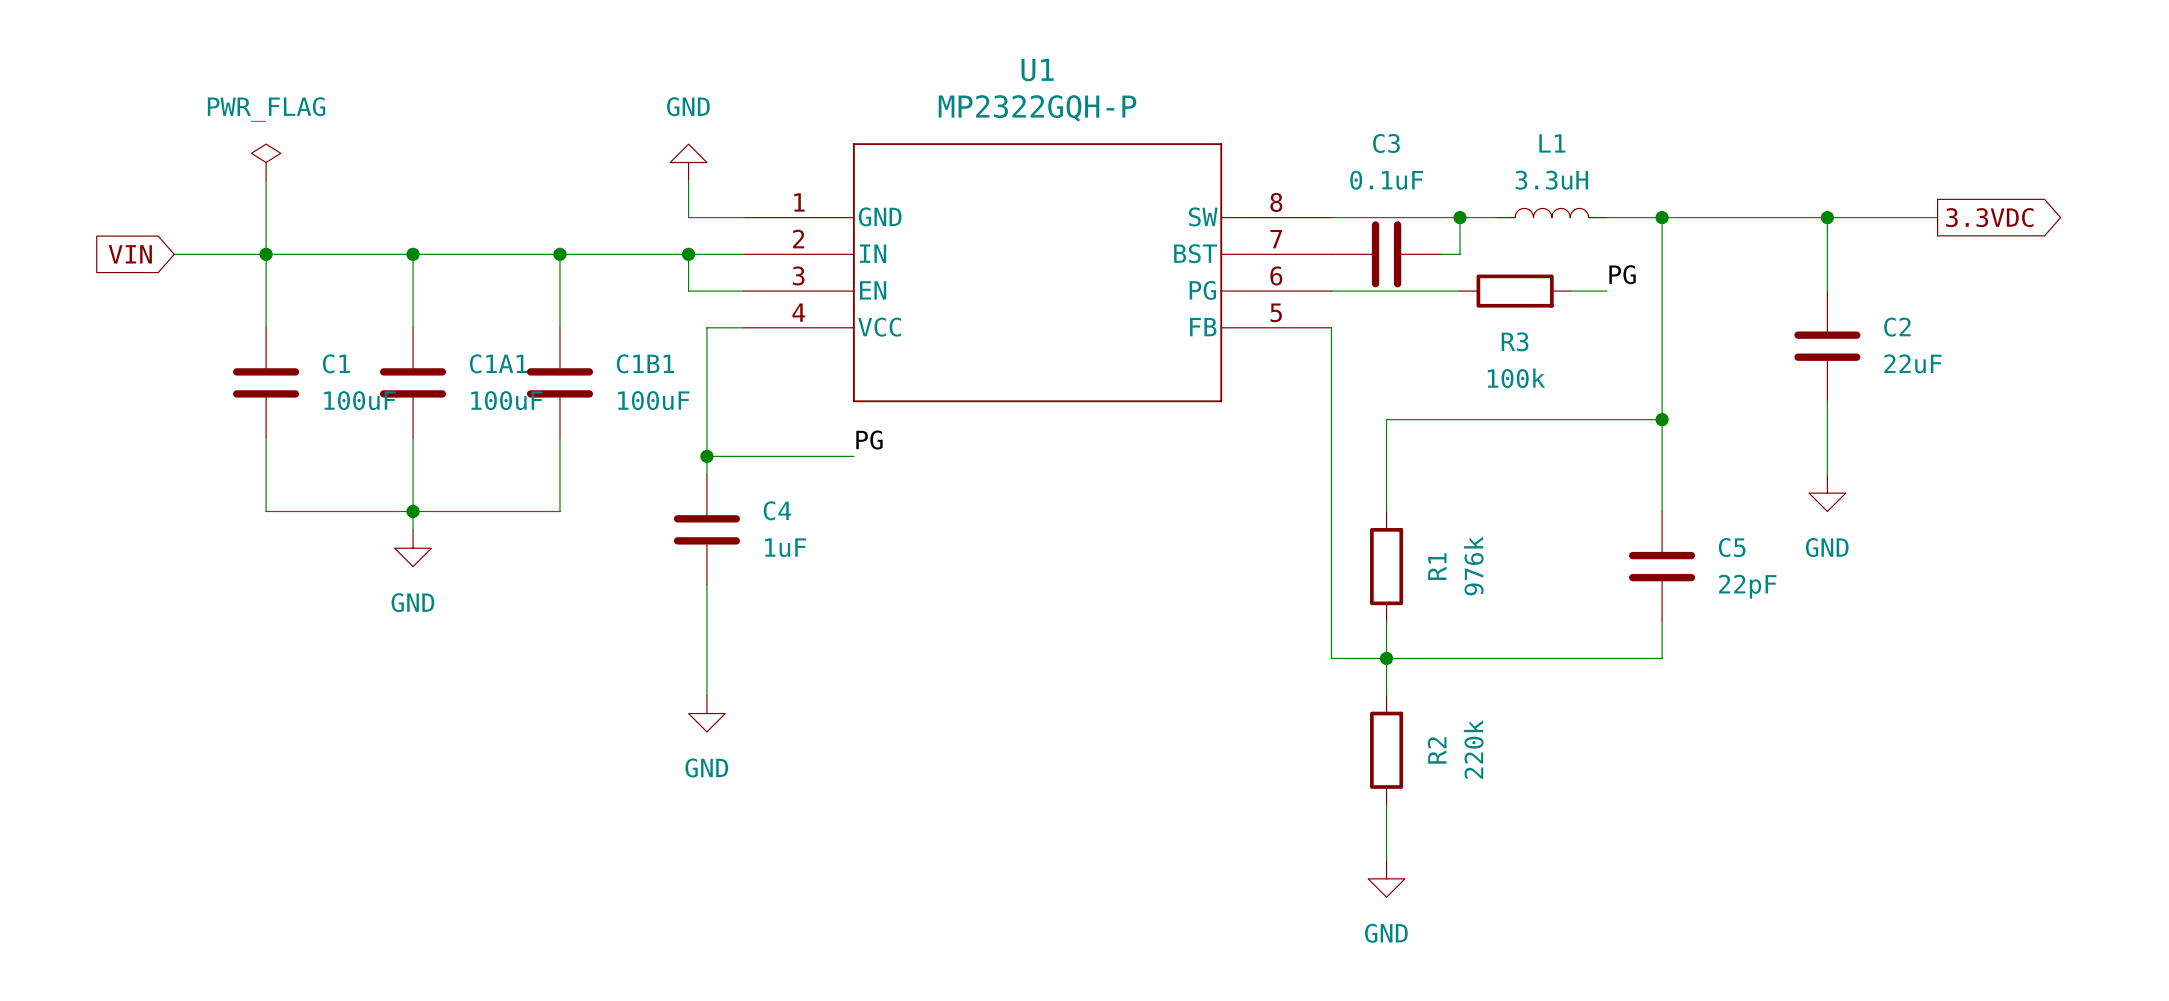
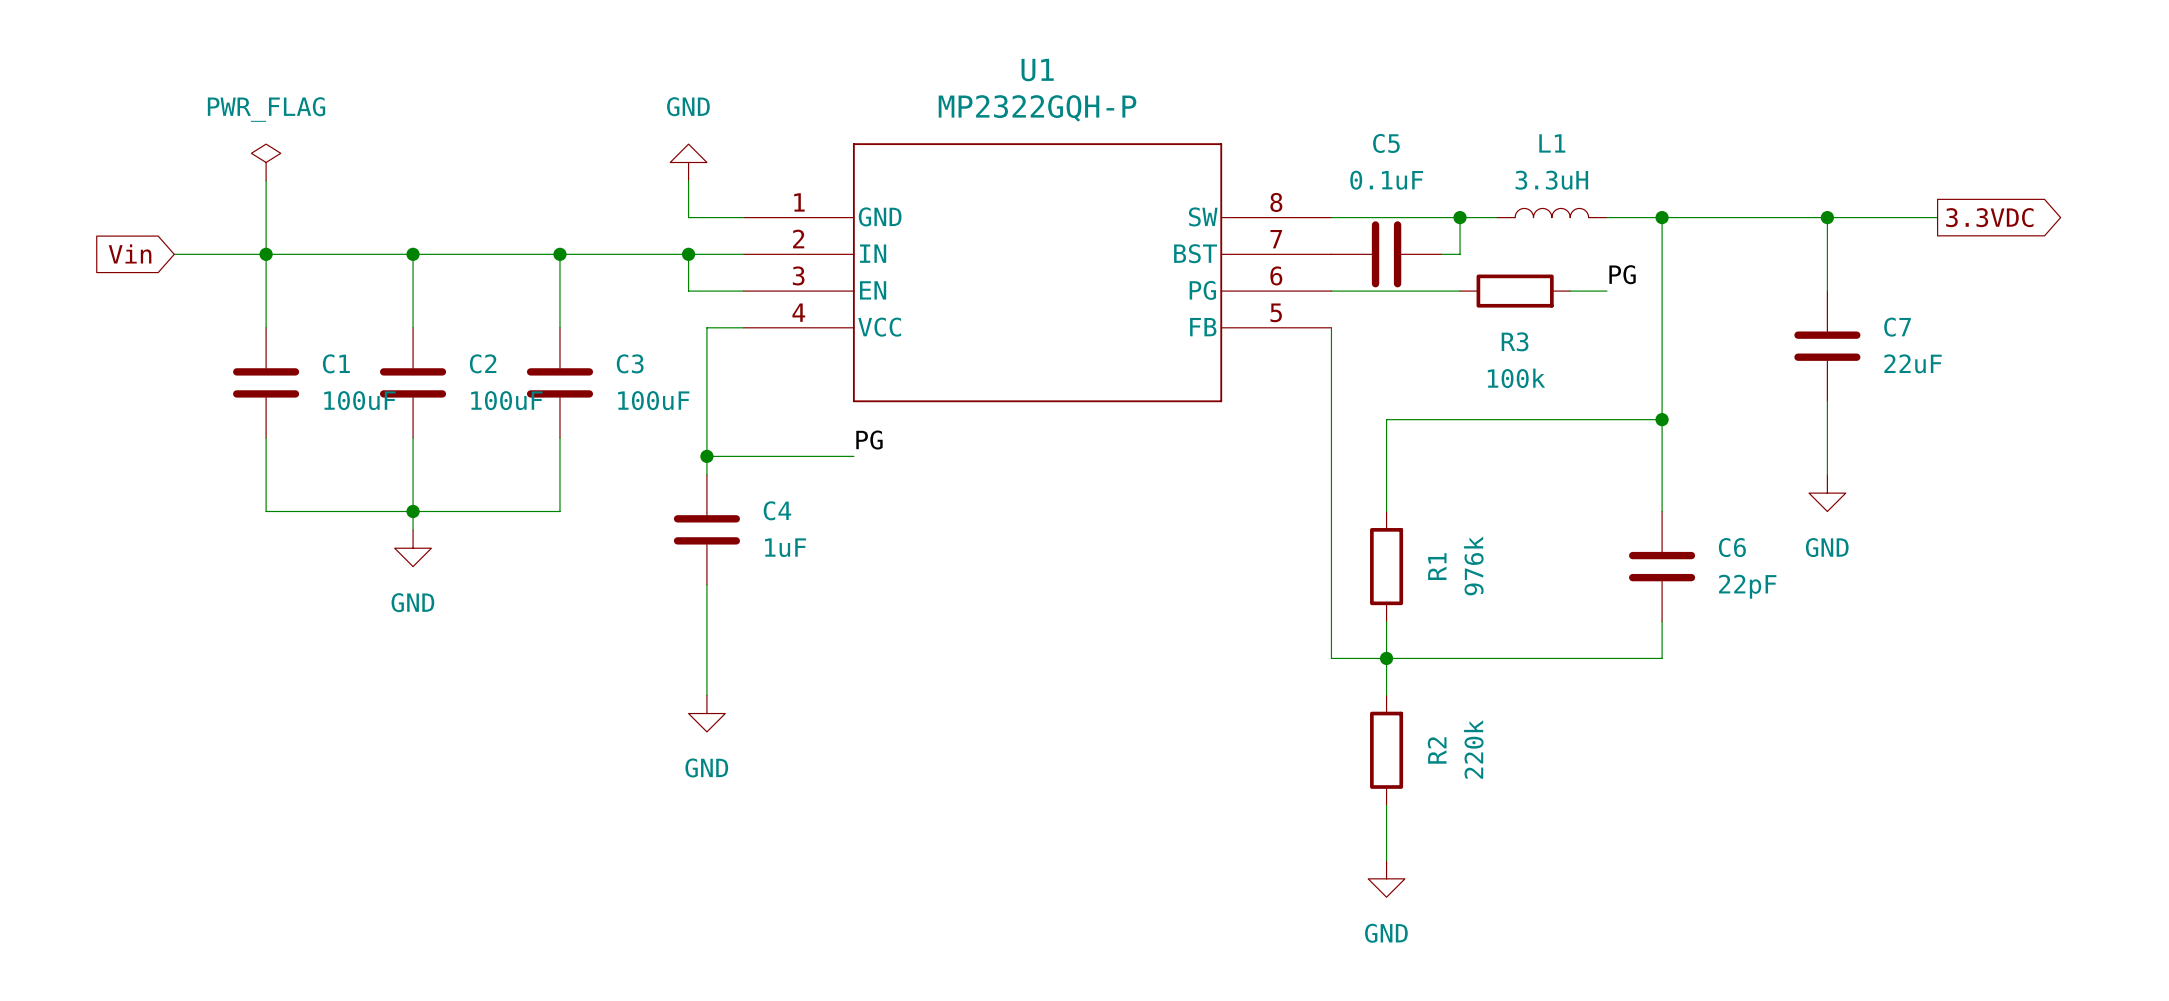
C3 name: C3 (1386, 143) -> C5 (1386, 143)
global label: VIN (130, 254) -> Vin (130, 253)
C2 name: C2 (1897, 327) -> C7 (1897, 327)
C1A1 name: C1A1 (498, 363) -> C2 (483, 363)
C1B1 name: C1B1 (645, 363) -> C3 (630, 363)
C5 name: C5 (1732, 547) -> C6 (1732, 547)

